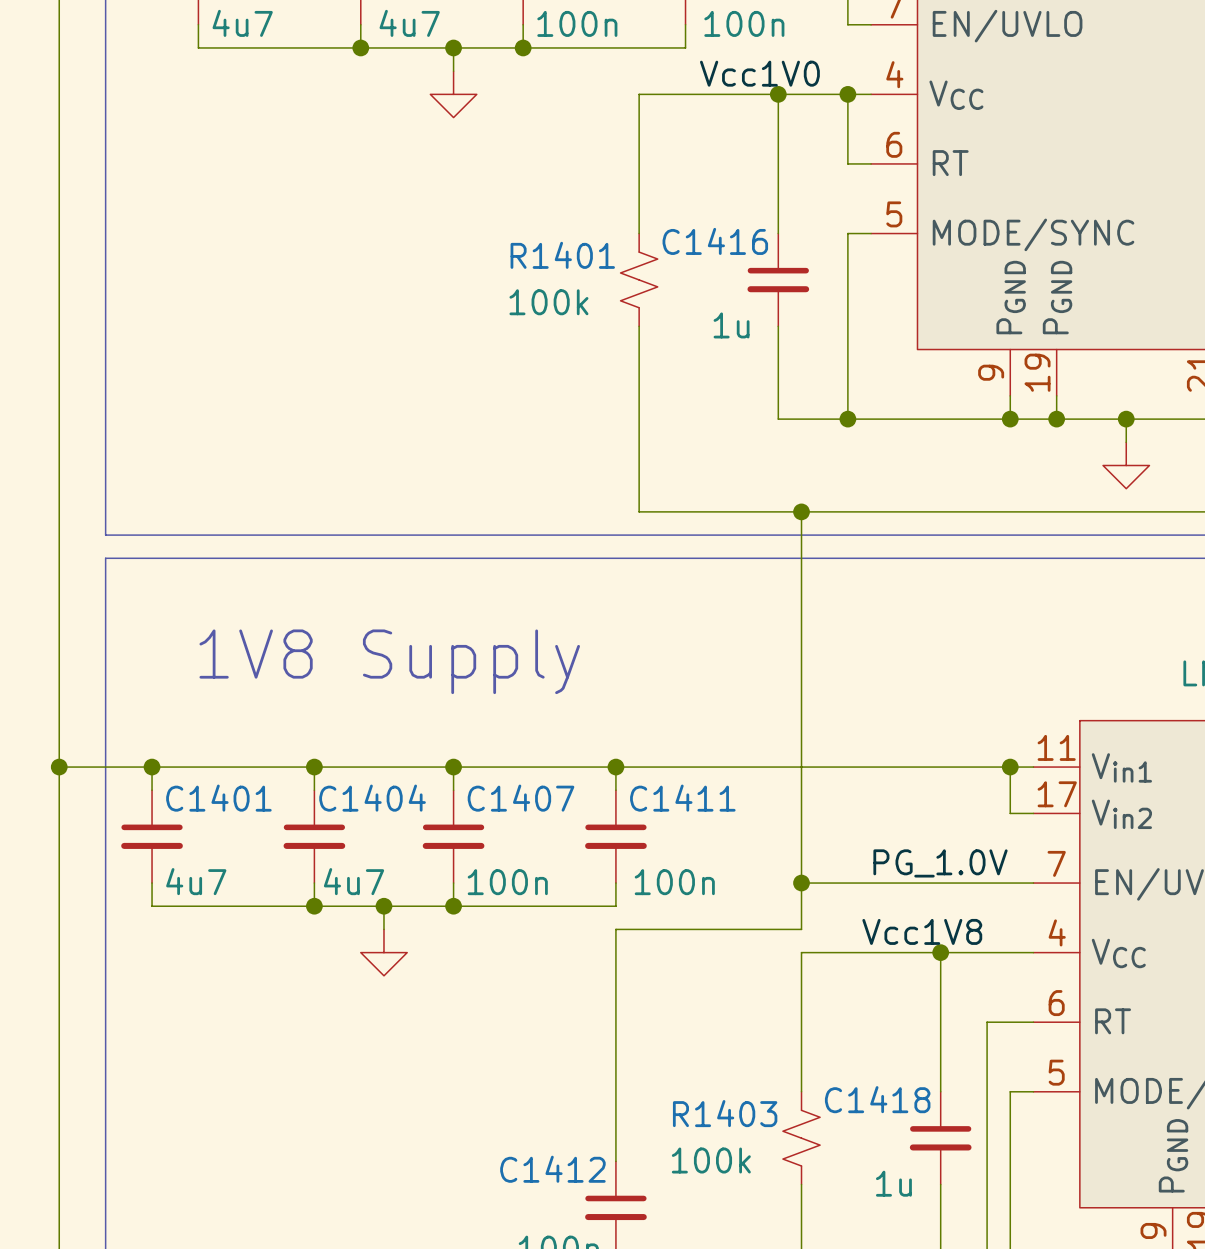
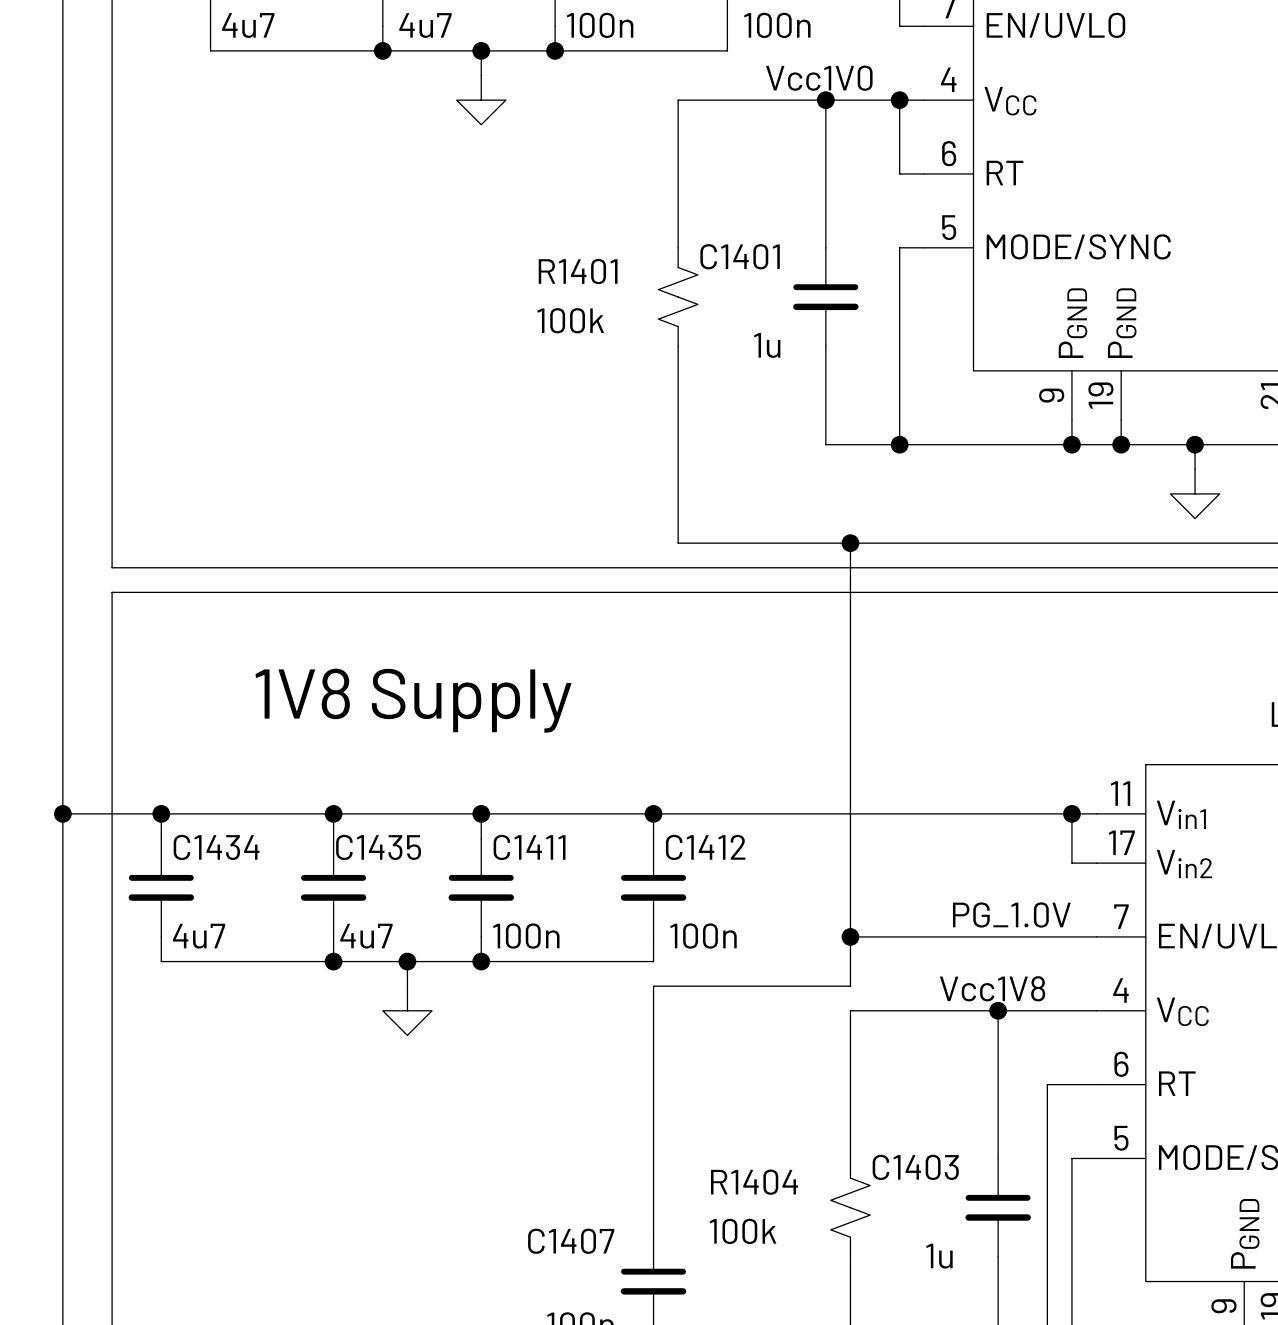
C1416 name: C1416 (715, 241) -> C1401 (740, 256)
C1401 name: C1401 (218, 798) -> C1434 (216, 847)
C1404 name: C1404 (372, 798) -> C1435 (378, 847)
C1407 name: C1407 (521, 798) -> C1411 (529, 847)
C1411 name: C1411 (682, 798) -> C1412 (705, 847)
C1418 name: C1418 (877, 1099) -> C1403 (915, 1167)
R1403 name: R1403 (725, 1113) -> R1404 (754, 1182)
C1412 name: C1412 (552, 1169) -> C1407 (571, 1241)

